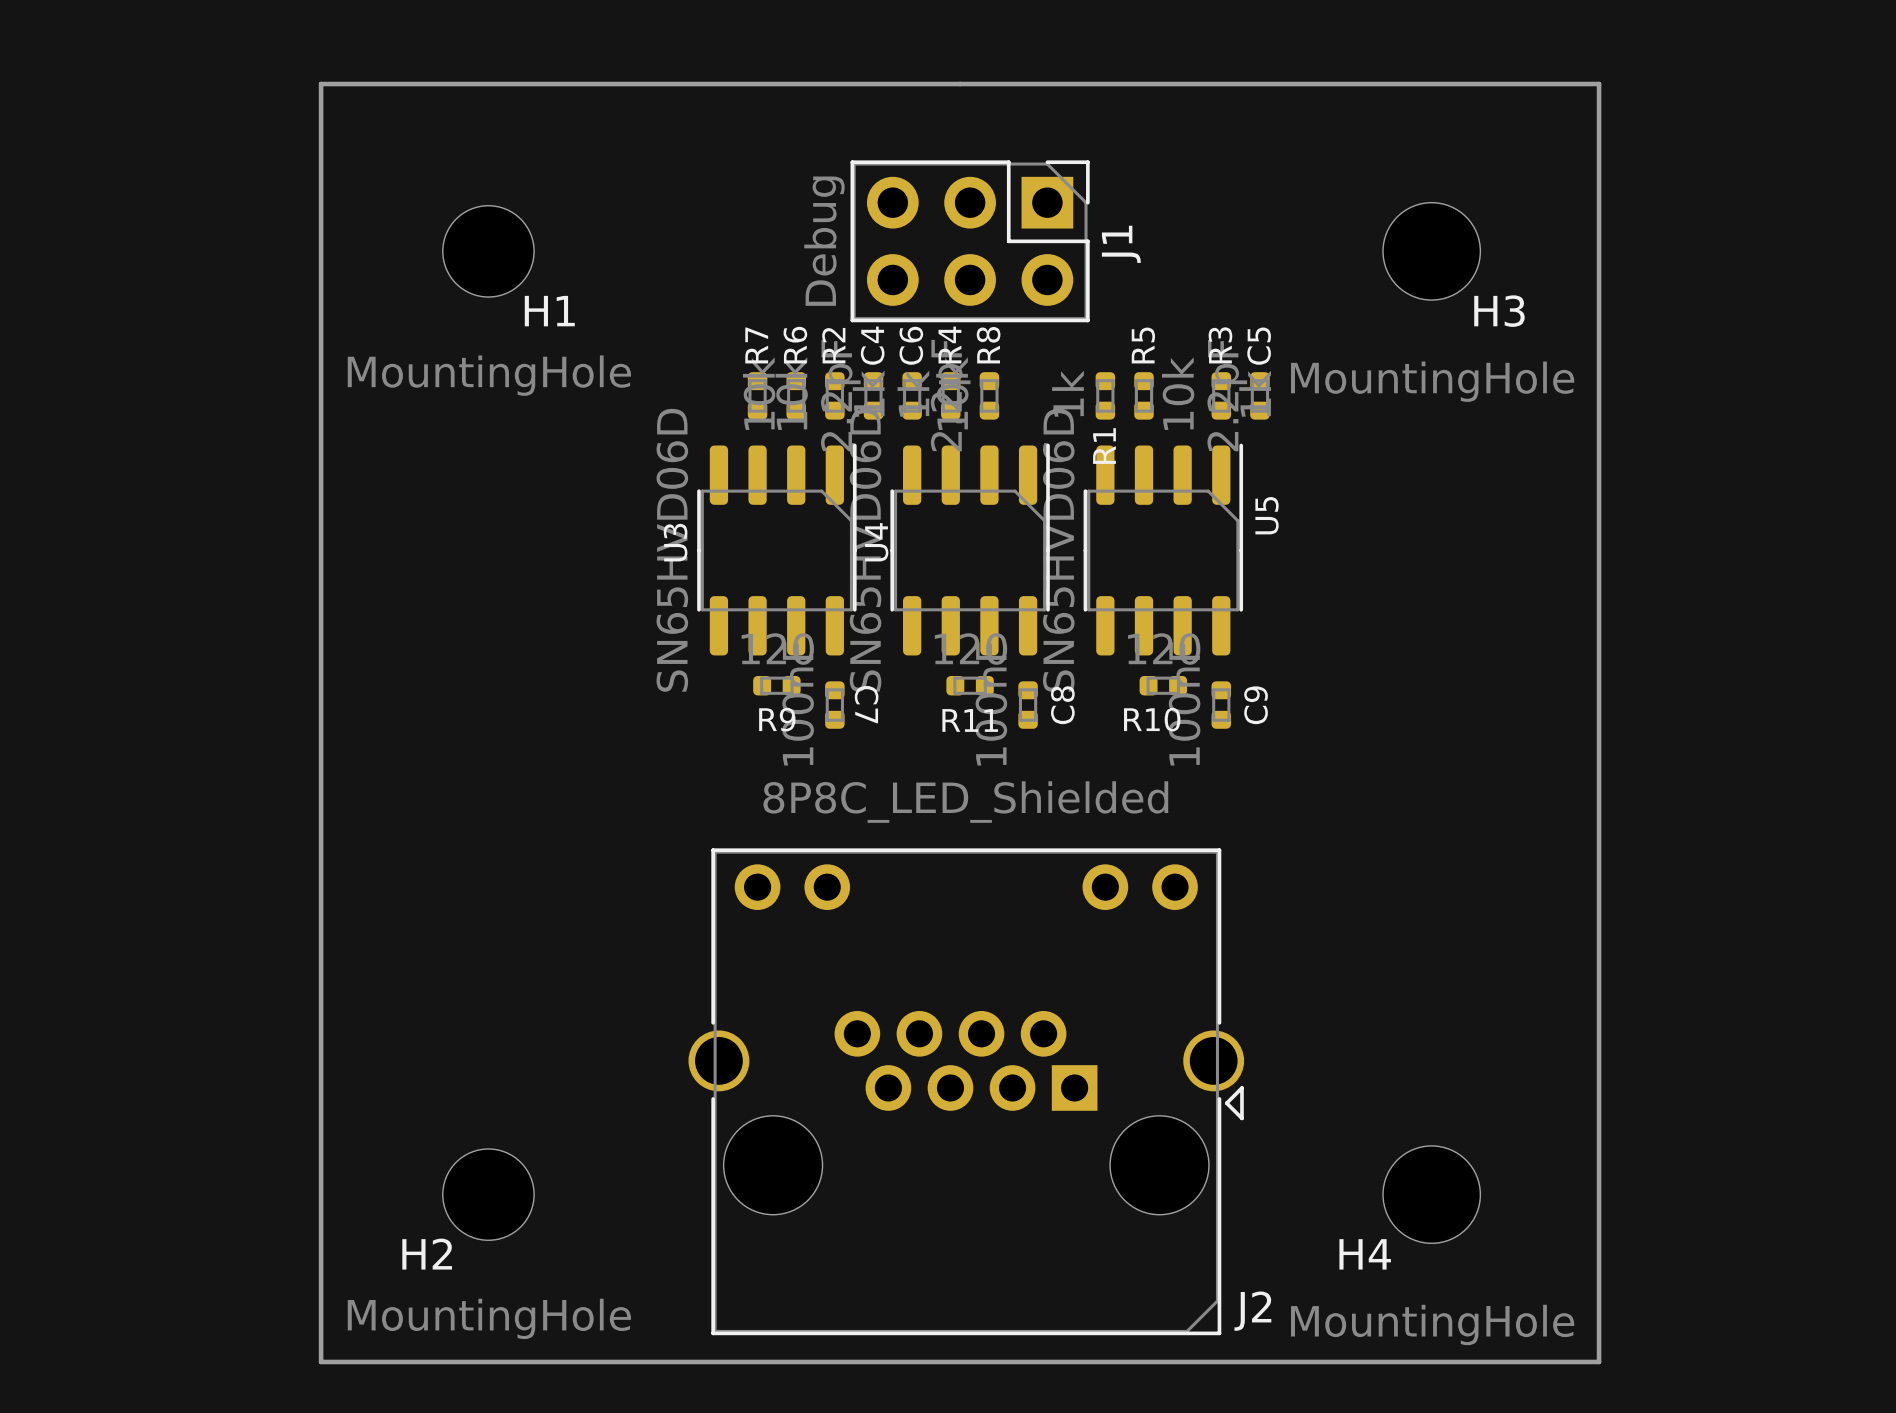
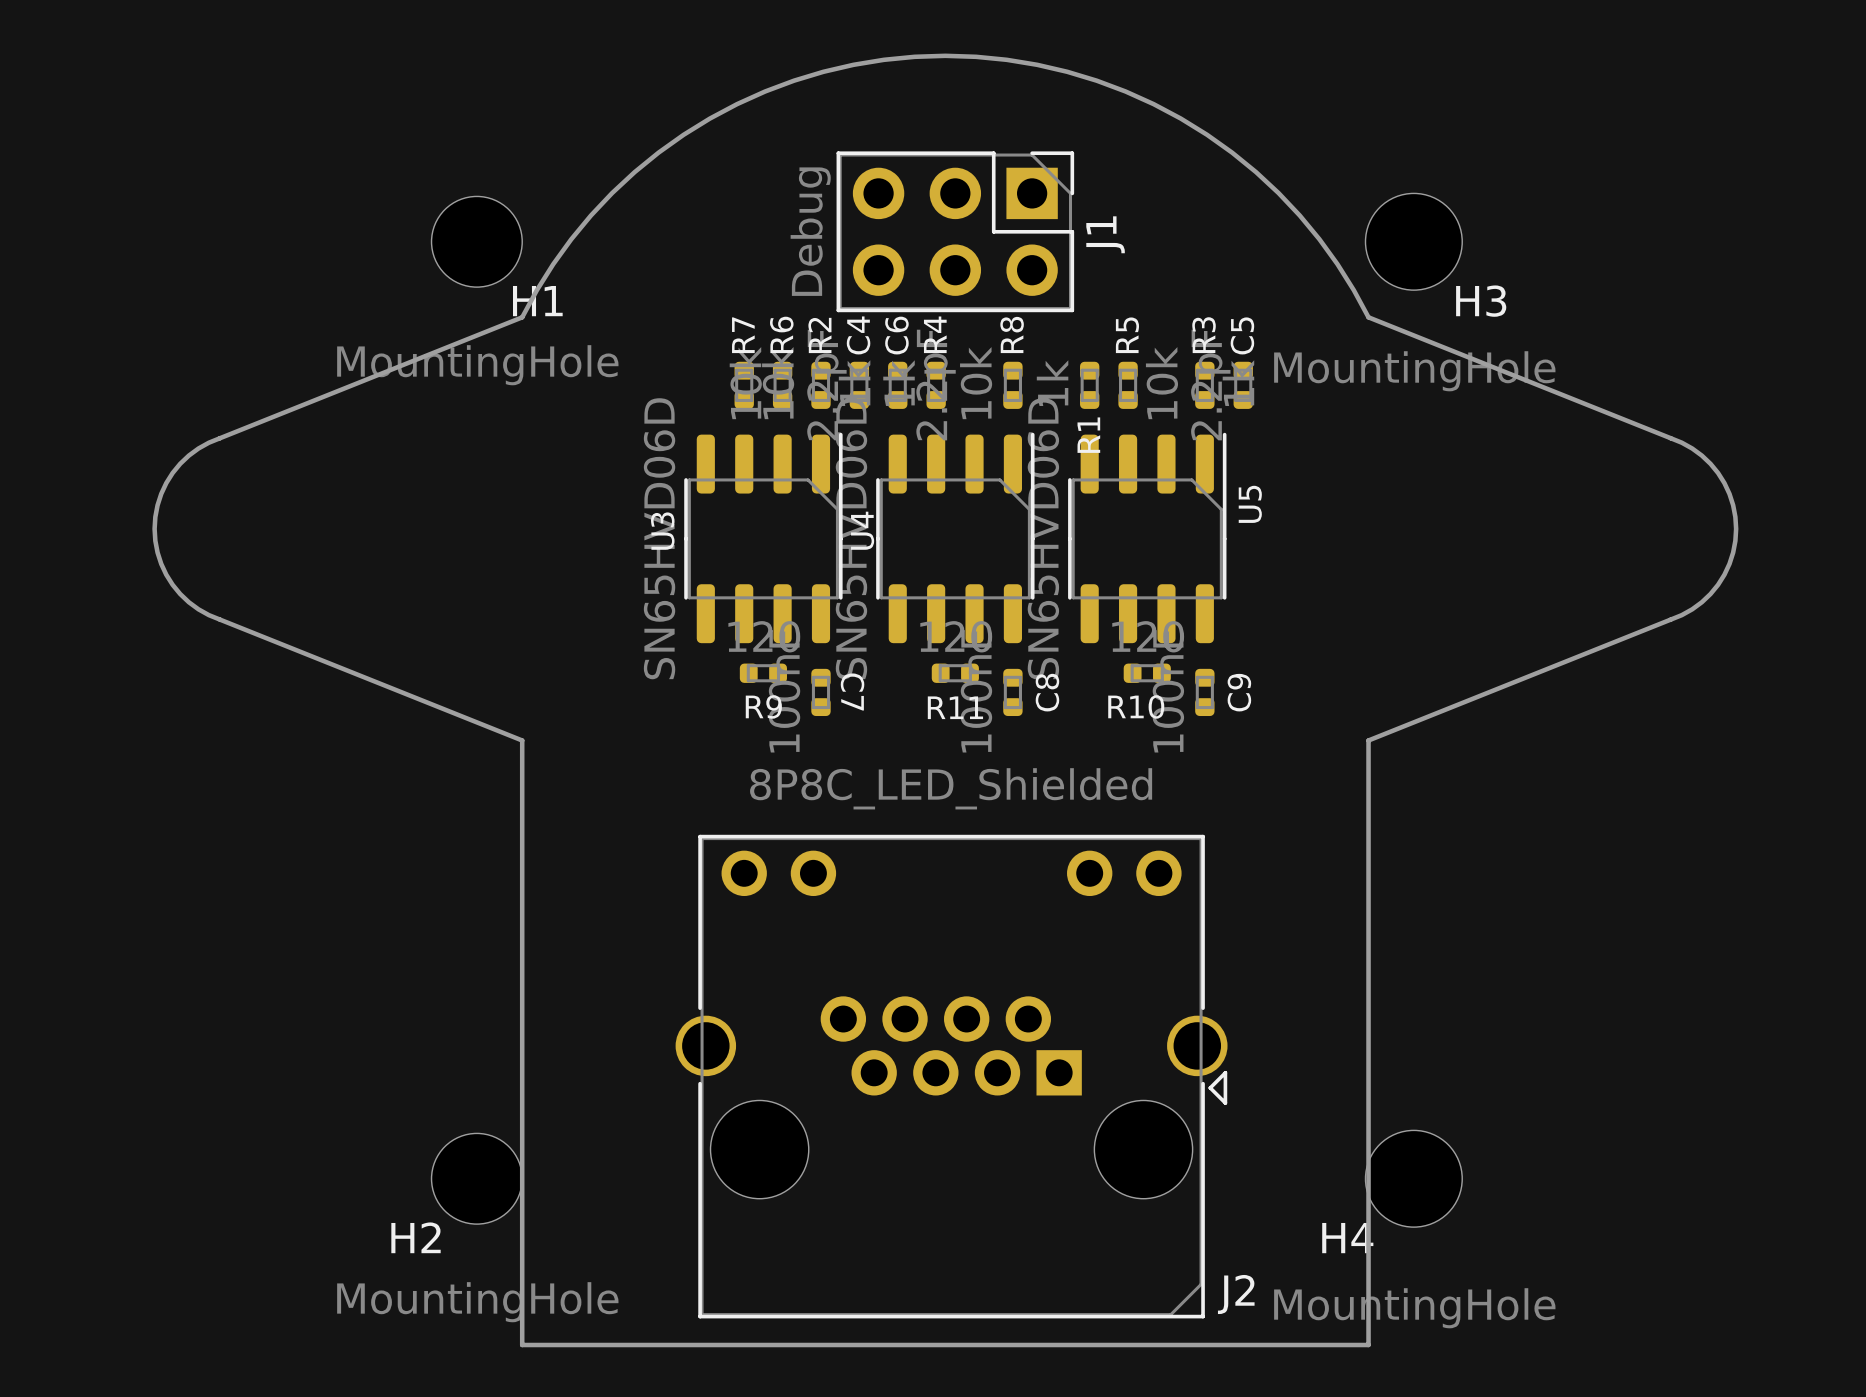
R8 position: (989, 395) -> (1012, 385)
board edge: (534, 1361) (321, 1361) (321, 84) (1599, 84) (1599, 1361) (1386, 1361) -> (522, 1345) (522, 740) (198, 609) (172, 584) (161, 563) (154, 528) (161, 493) (180, 463) (208, 442) (522, 317) (553, 264) (571, 239) (612, 193) (658, 152) (709, 118) (765, 91) (823, 71) (883, 59) (945, 55) (1006, 59) (1067, 71) (1125, 91) (1180, 118) (1232, 152) (1278, 193) (1319, 239) (1353, 290) (1368, 317) (1681, 442) (1710, 463) (1729, 493) (1736, 528) (1729, 563) (1718, 584) (1692, 609) (1368, 740) (1368, 1345)

